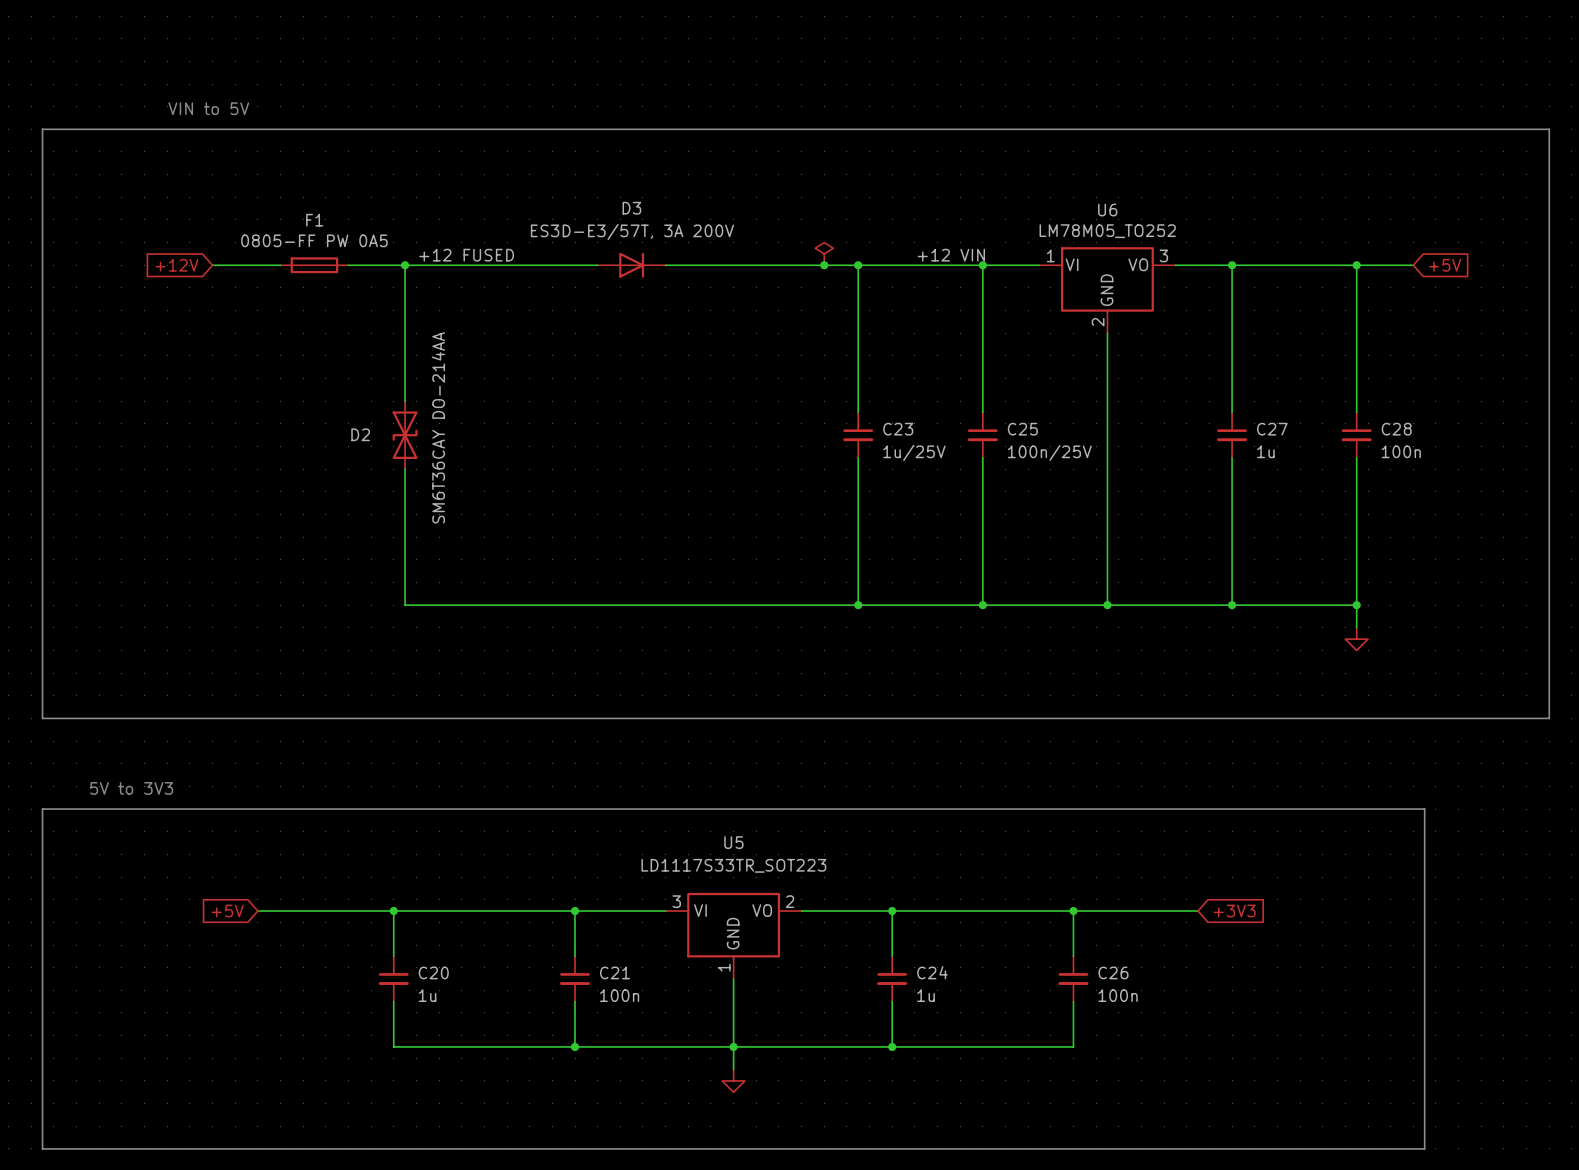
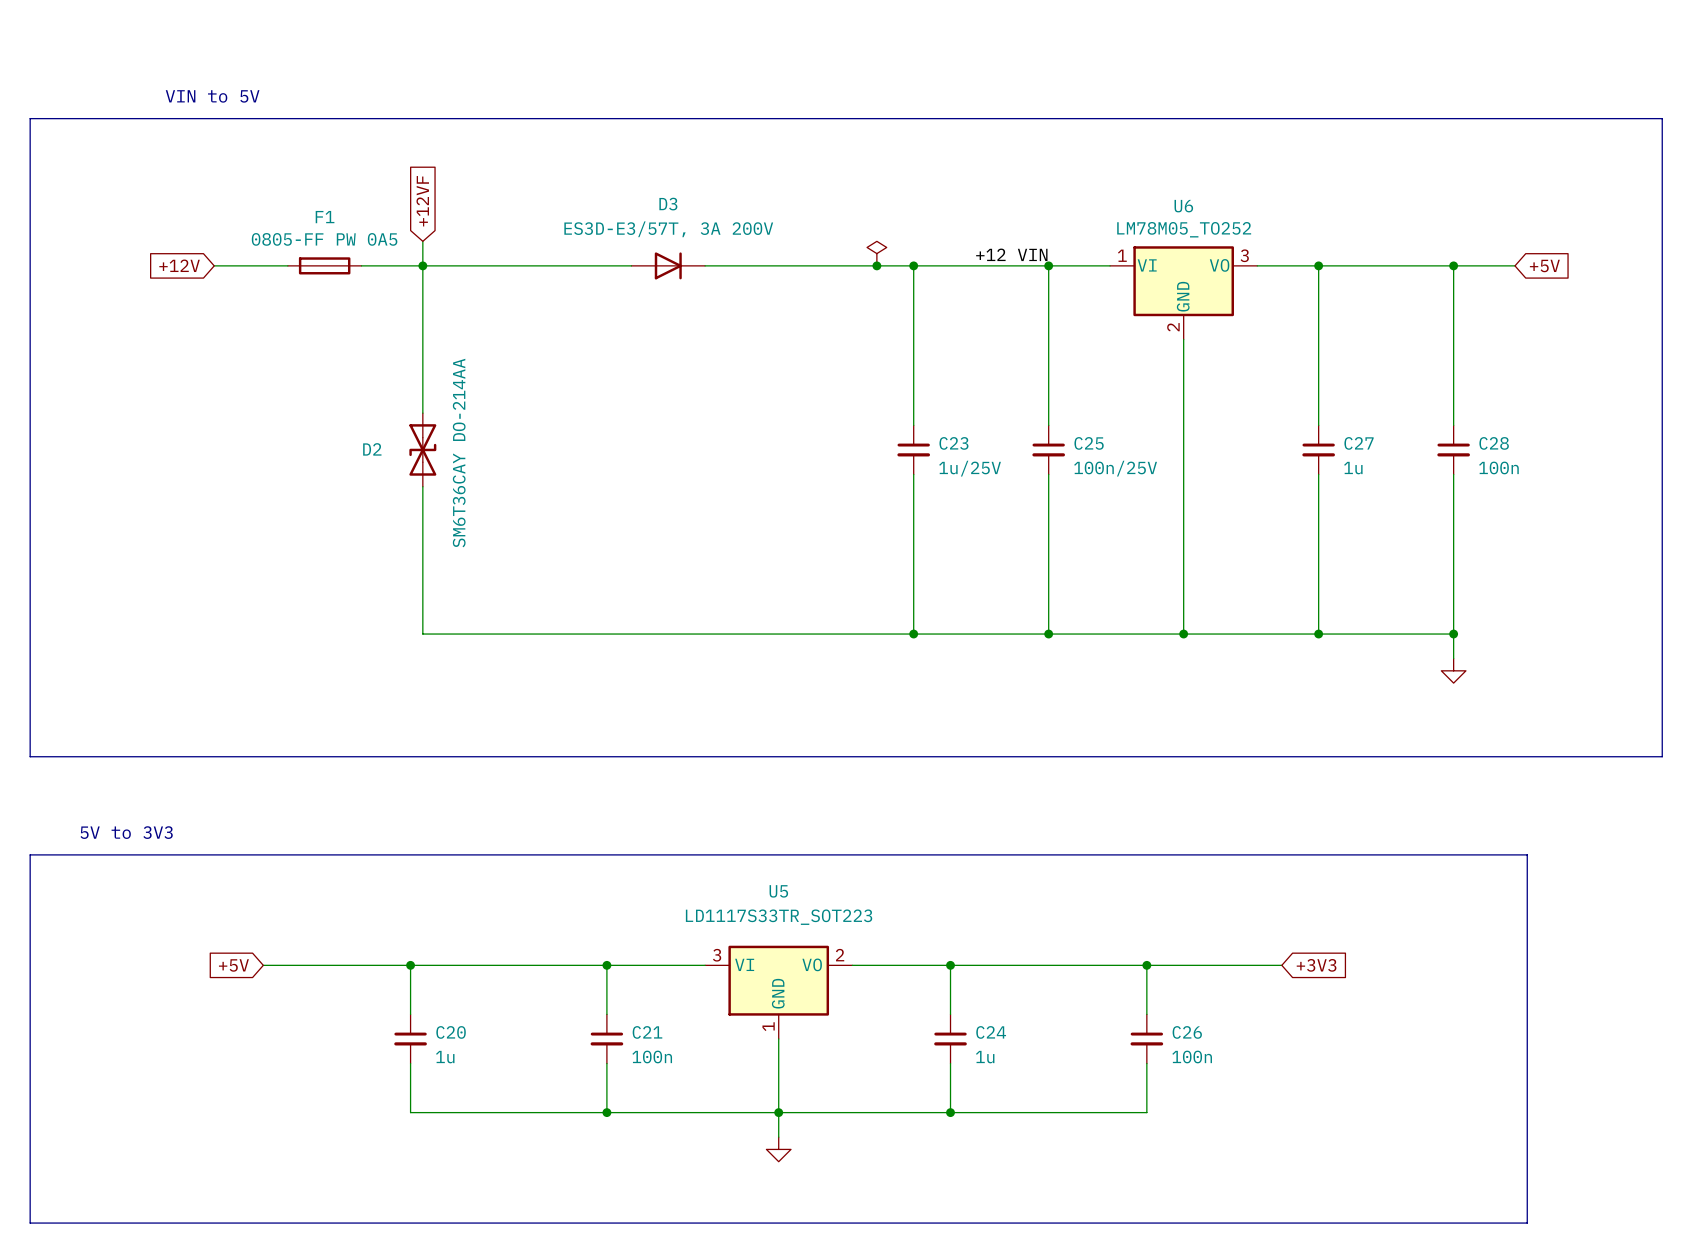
global label: none -> +12VF (422, 201)
wire: none -> (422, 241) (422, 265)
label: +12 FUSED (466, 255) -> none

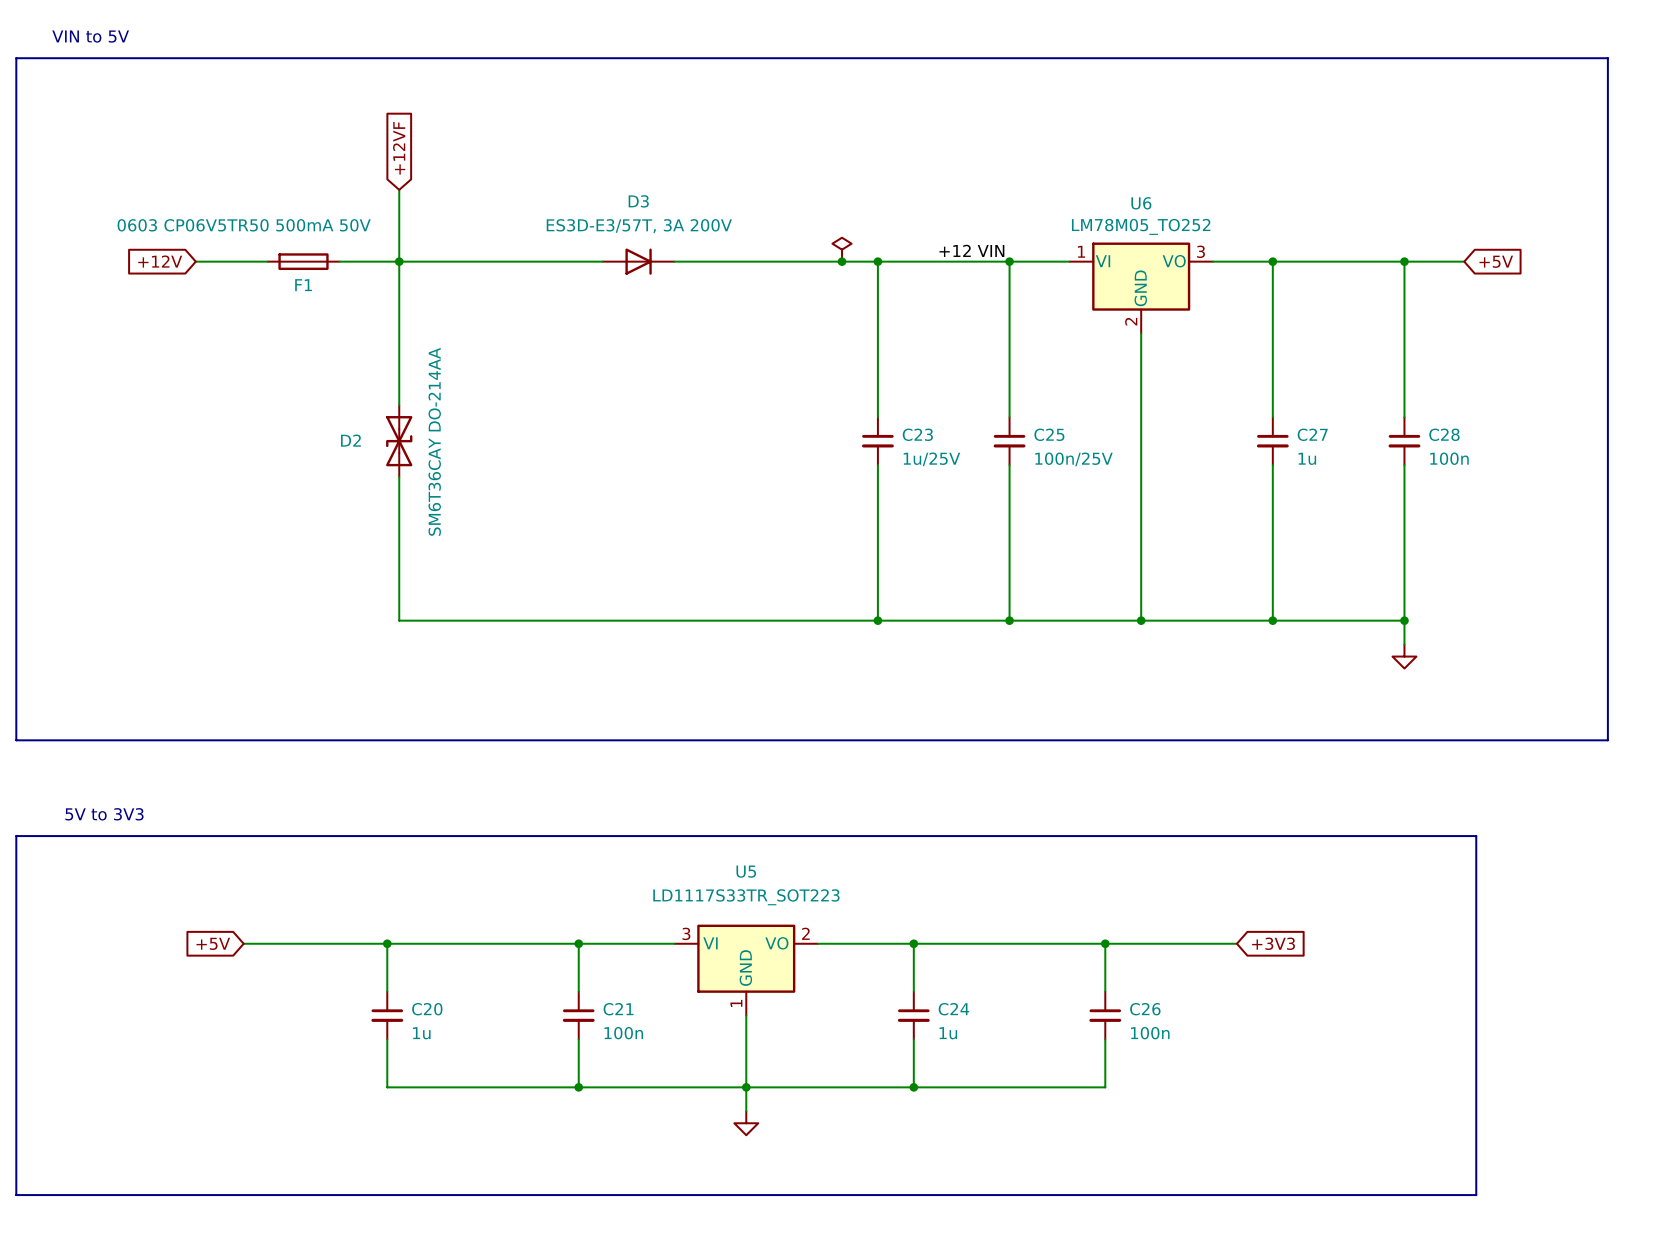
text position: VIN to 5V (212, 96) -> VIN to 5V (90, 36)
line: (30, 118) (1662, 118) -> (16, 118) (16, 58) (1607, 58) (1607, 118)
wire: none -> (399, 189) (399, 237)
global label position: +12VF (422, 201) -> +12VF (399, 148)
F1 name position: F1 (325, 217) -> F1 (303, 285)
F1 value: 0805-FF PW 0A5 (324, 239) -> 0603 CP06V5TR50 500mA 50V (244, 225)

